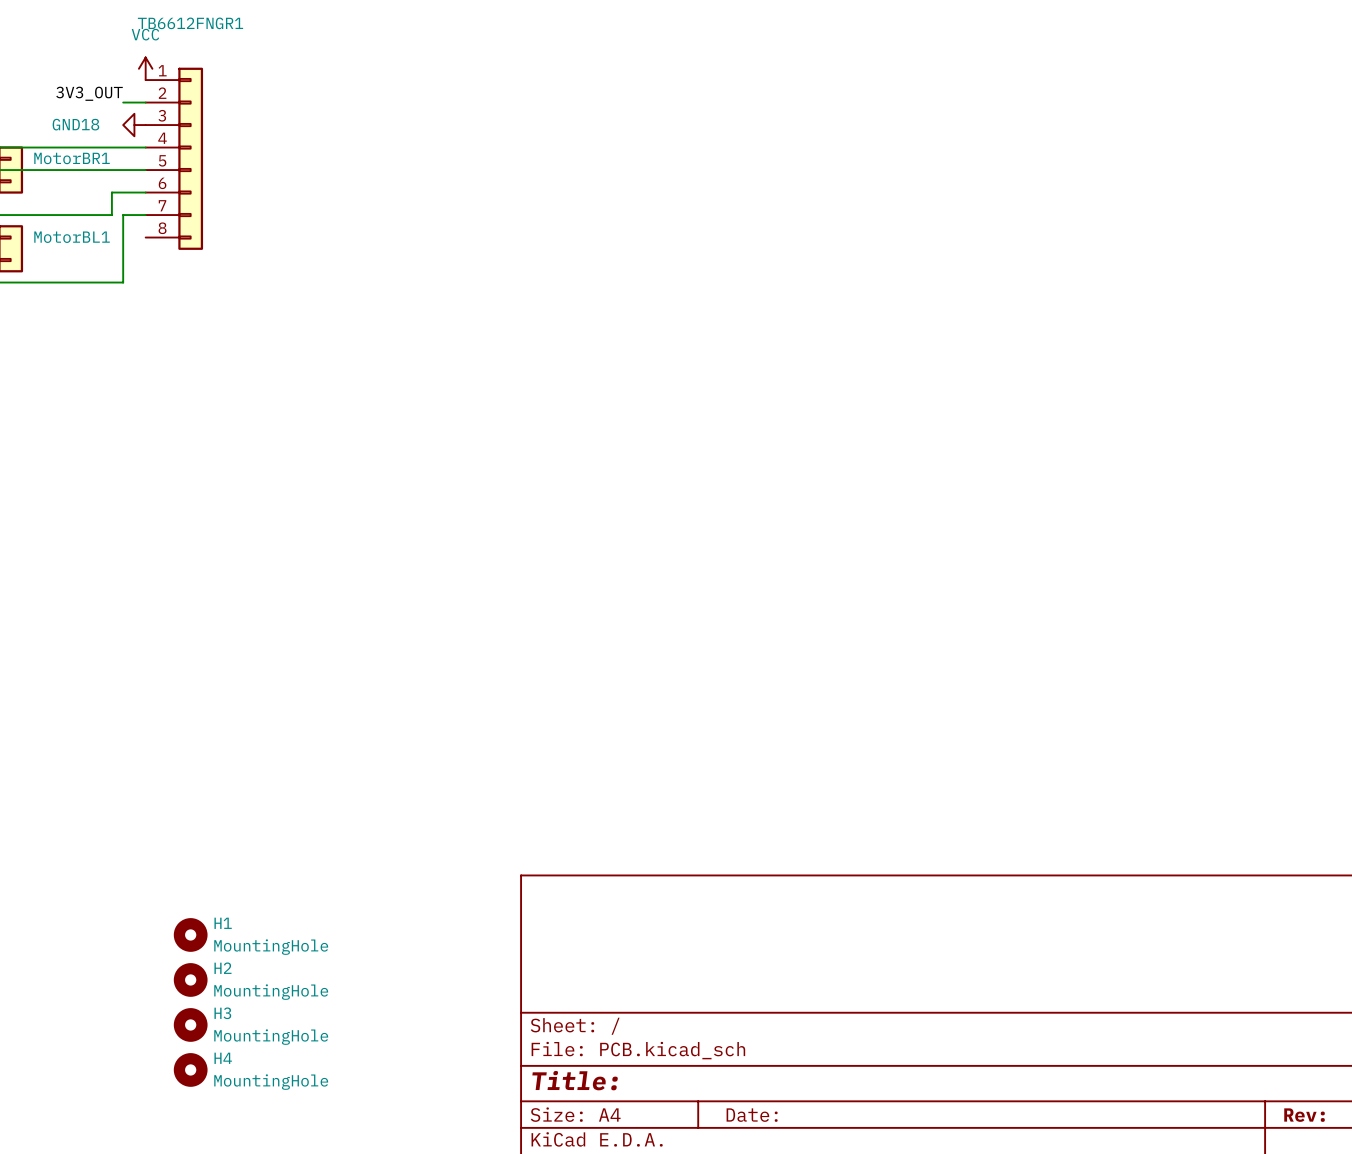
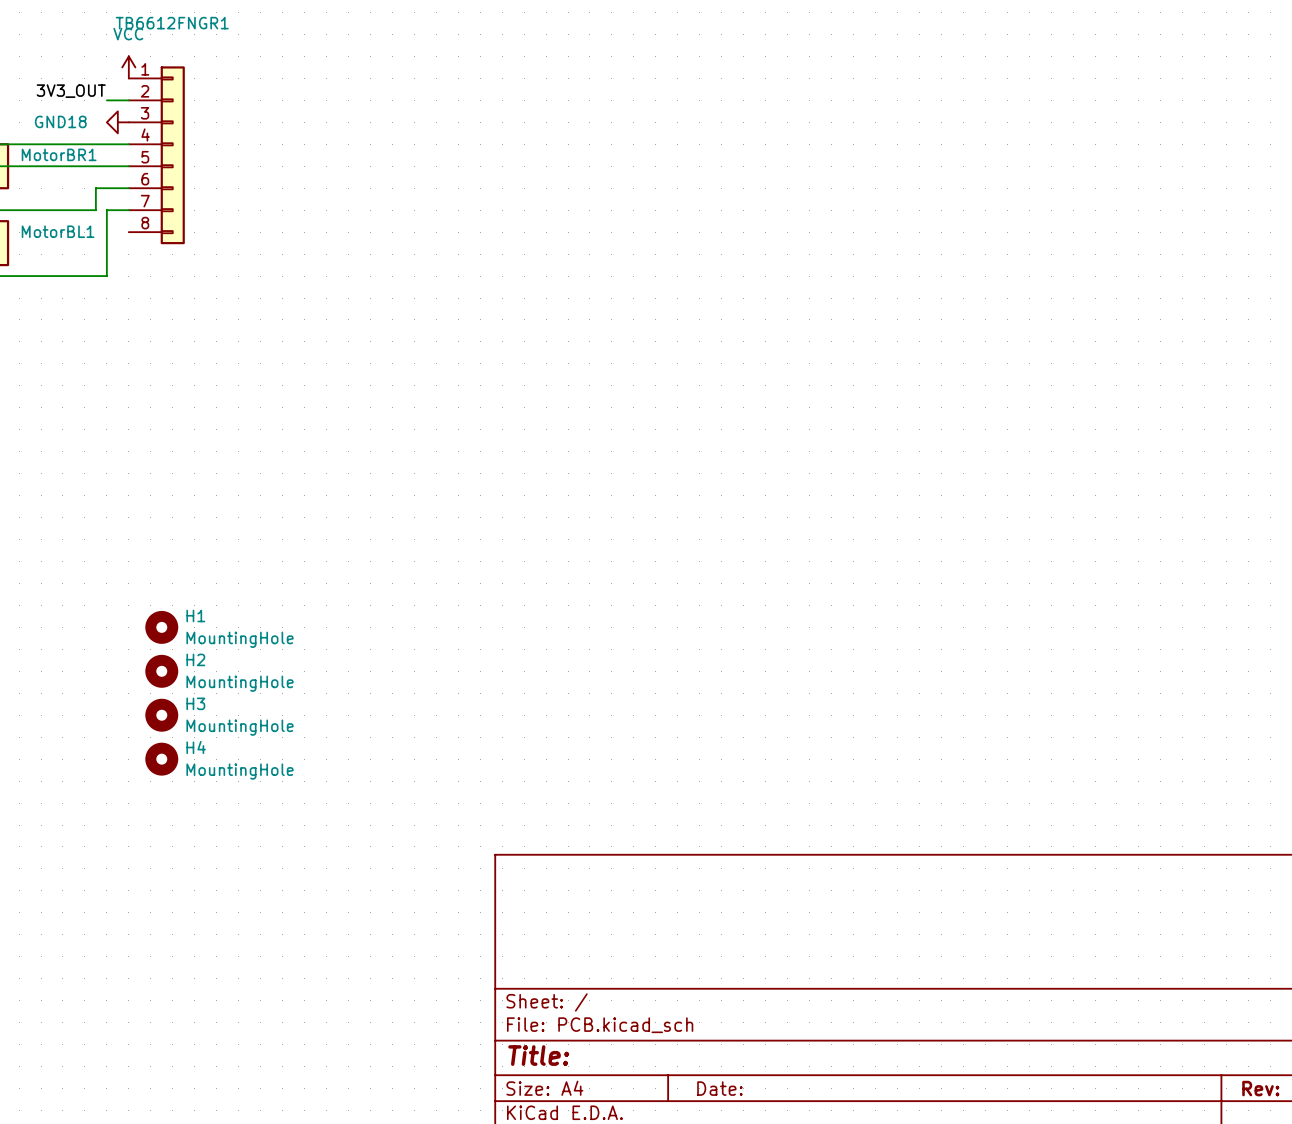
H1 position: (190, 934) -> (161, 627)
H2 position: (190, 979) -> (161, 671)
H3 position: (190, 1024) -> (161, 715)
H4 position: (190, 1069) -> (161, 759)

